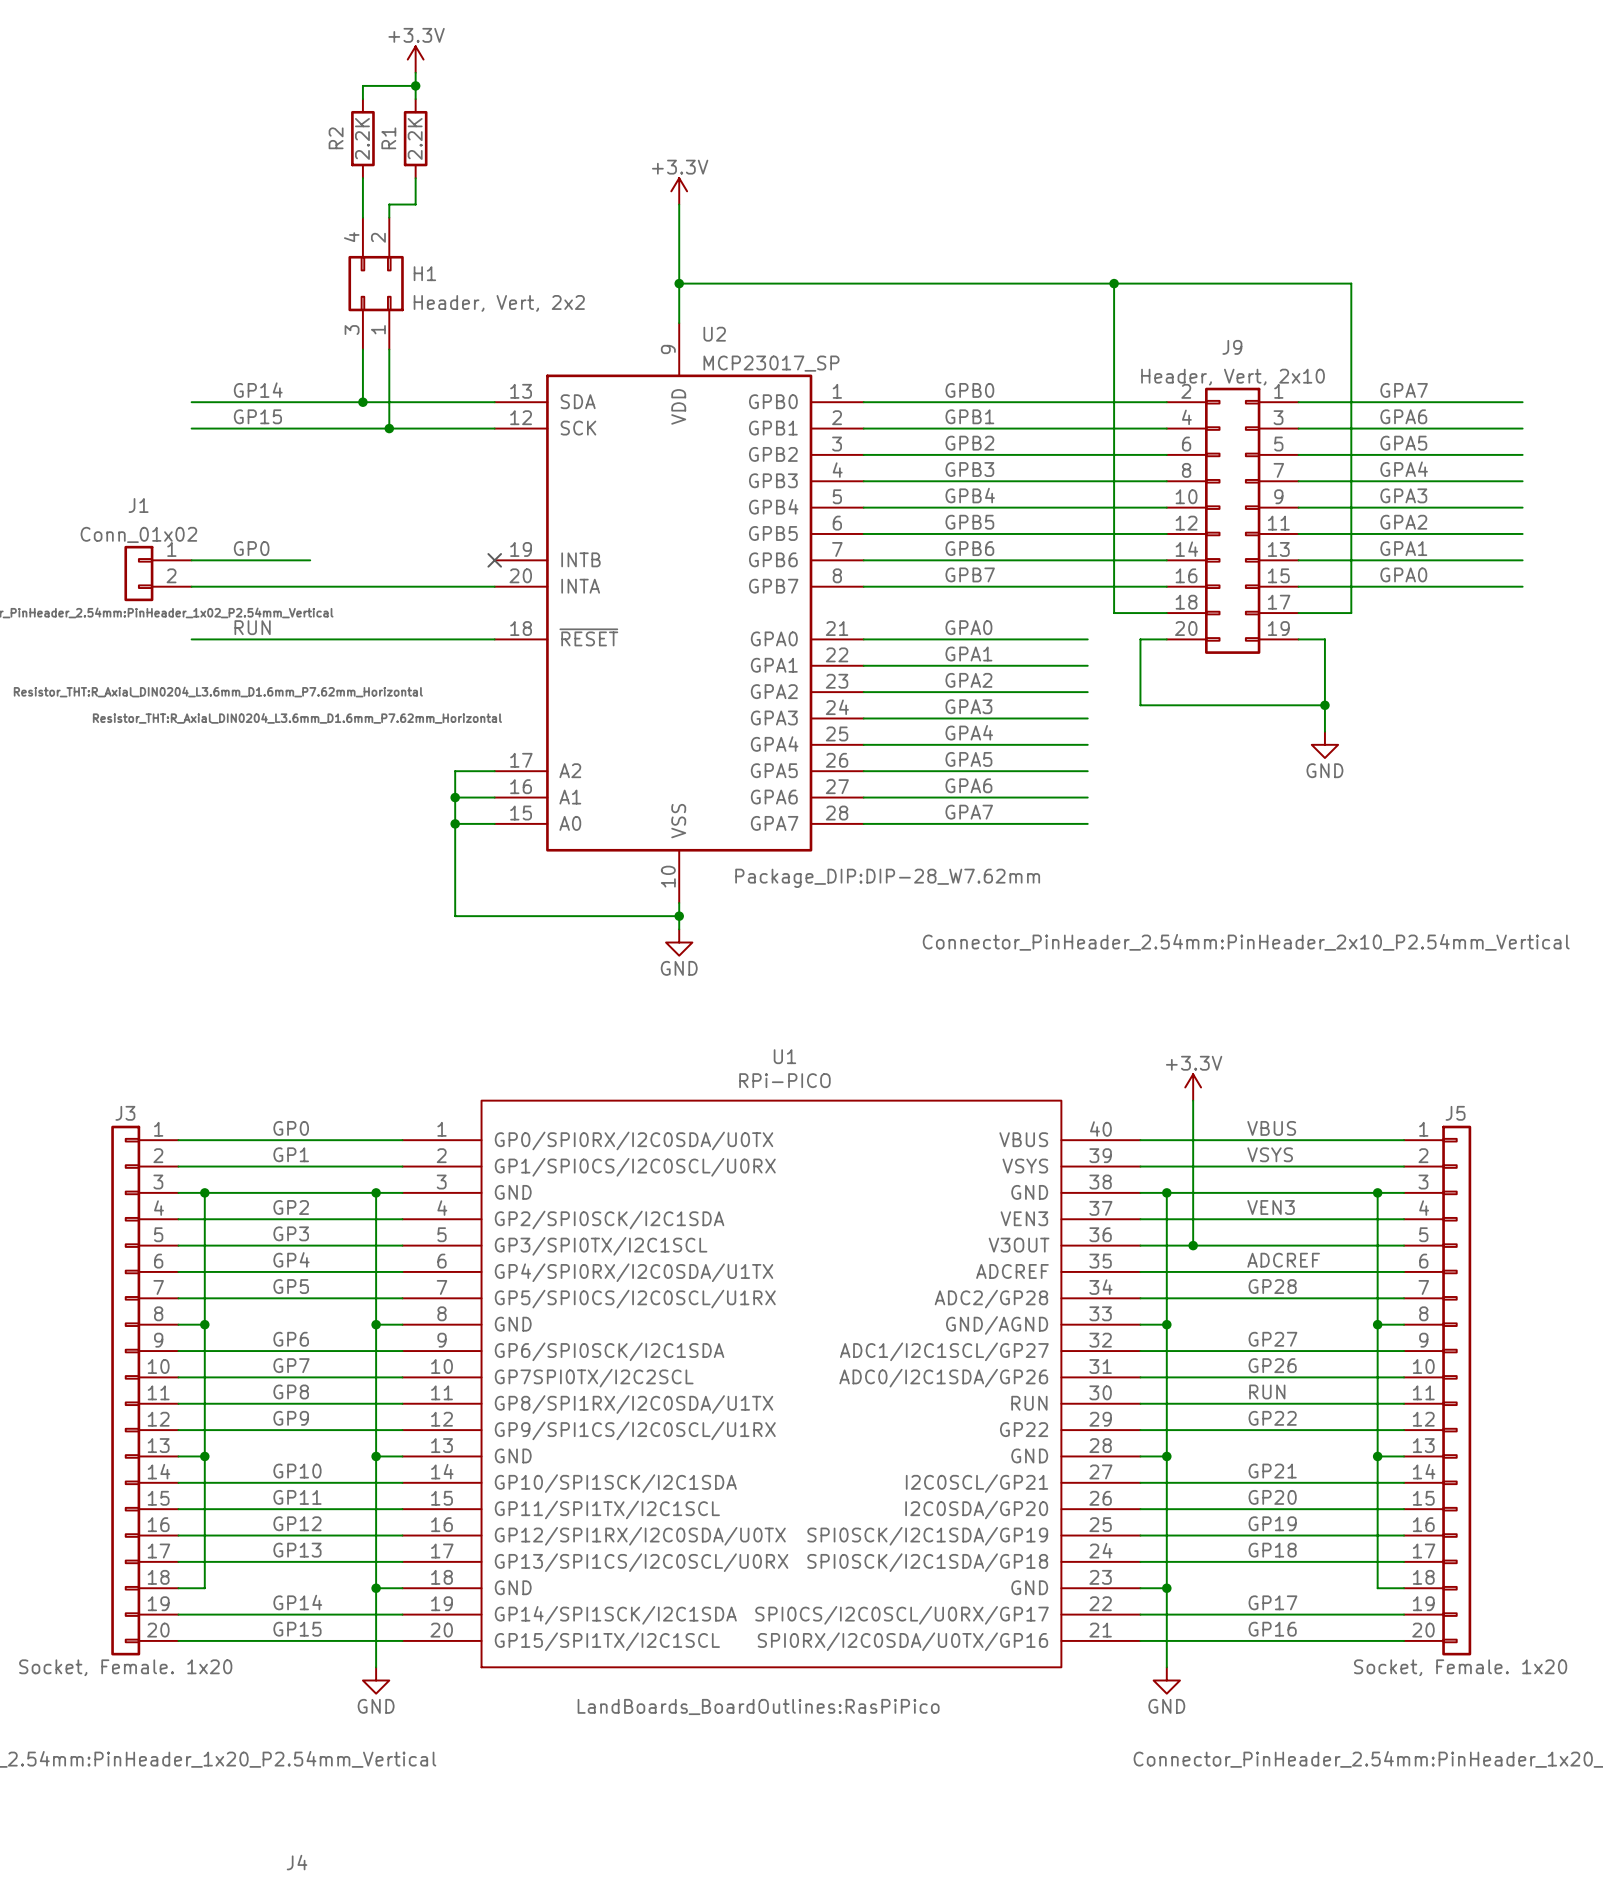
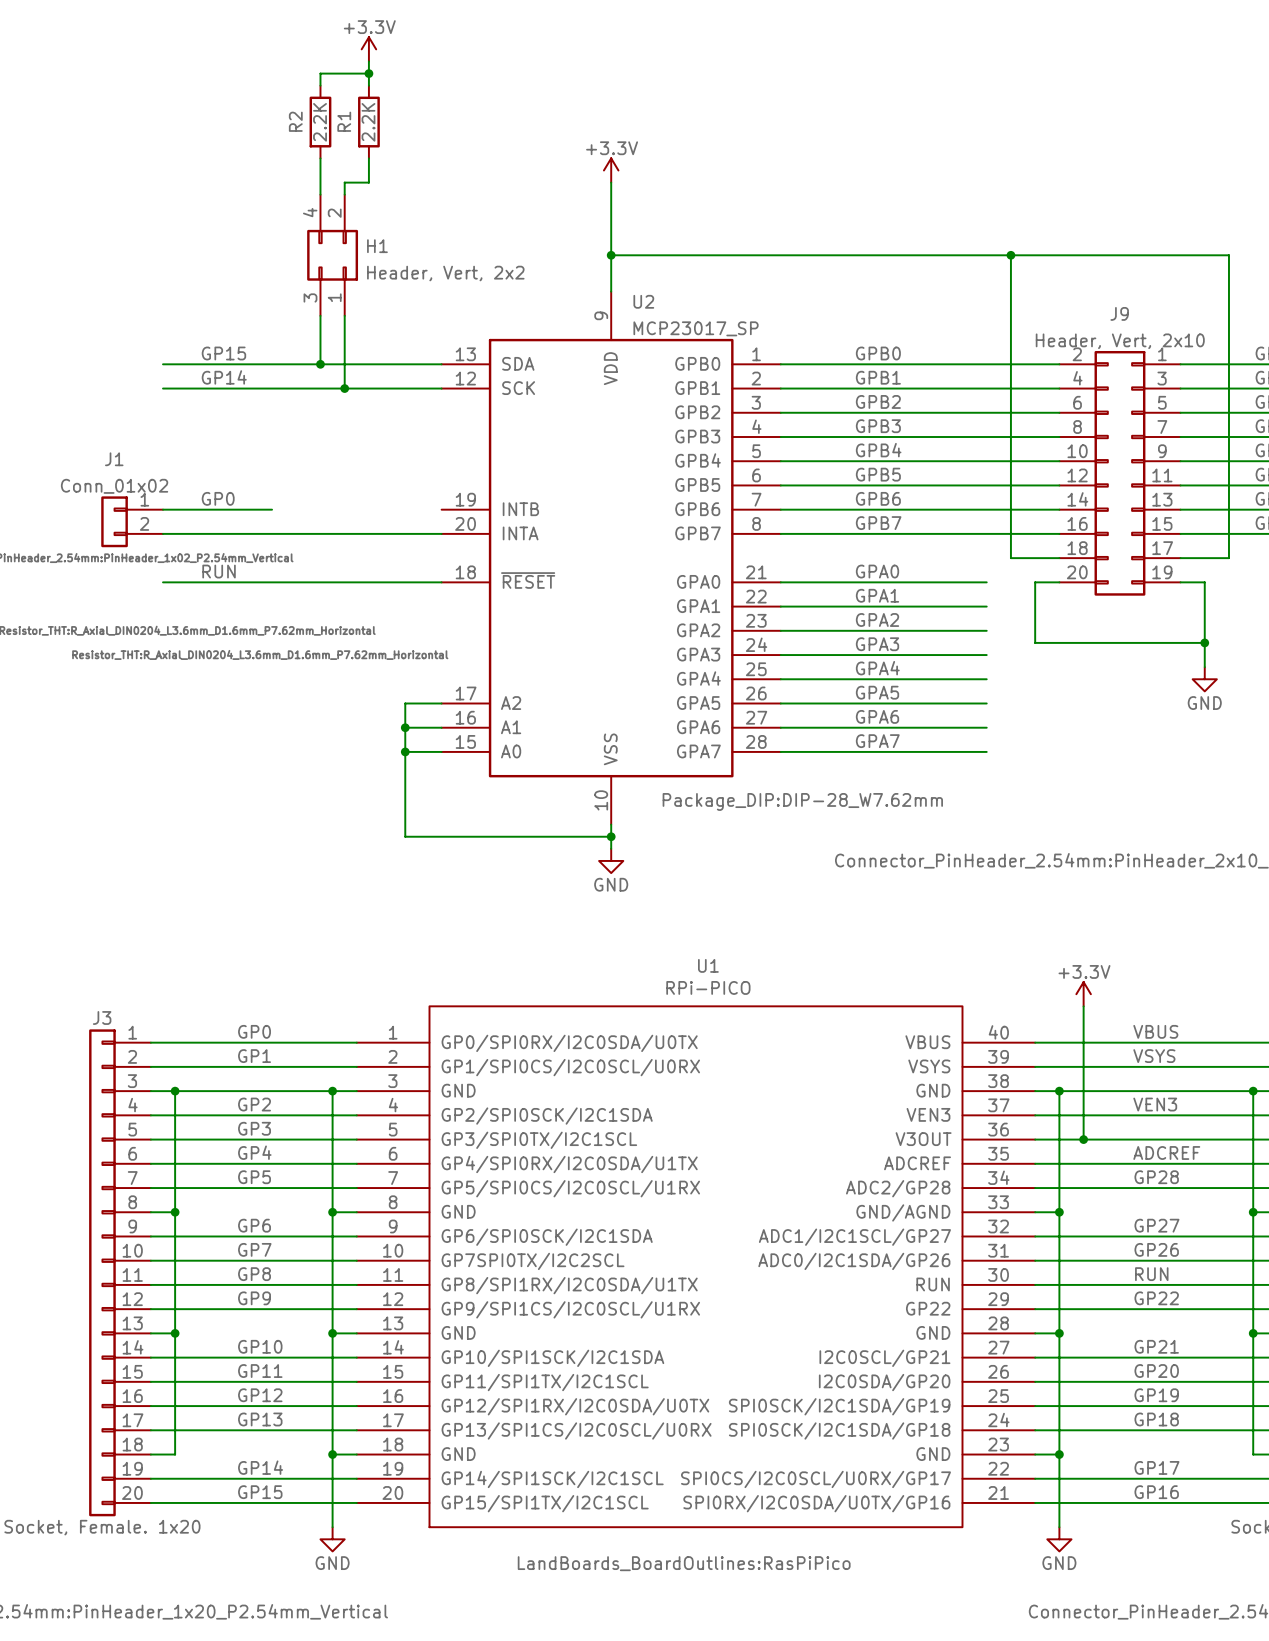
label: GP14 (258, 390) -> GP15 (223, 353)
label: GP15 (257, 416) -> GP14 (224, 377)
no-connect mark: (494, 560) -> none
U1 pin name: GP14/SPI1SCK/I2C1SDA (615, 1615) -> GP14/SPI1SCK/I2C1SCL (552, 1479)

